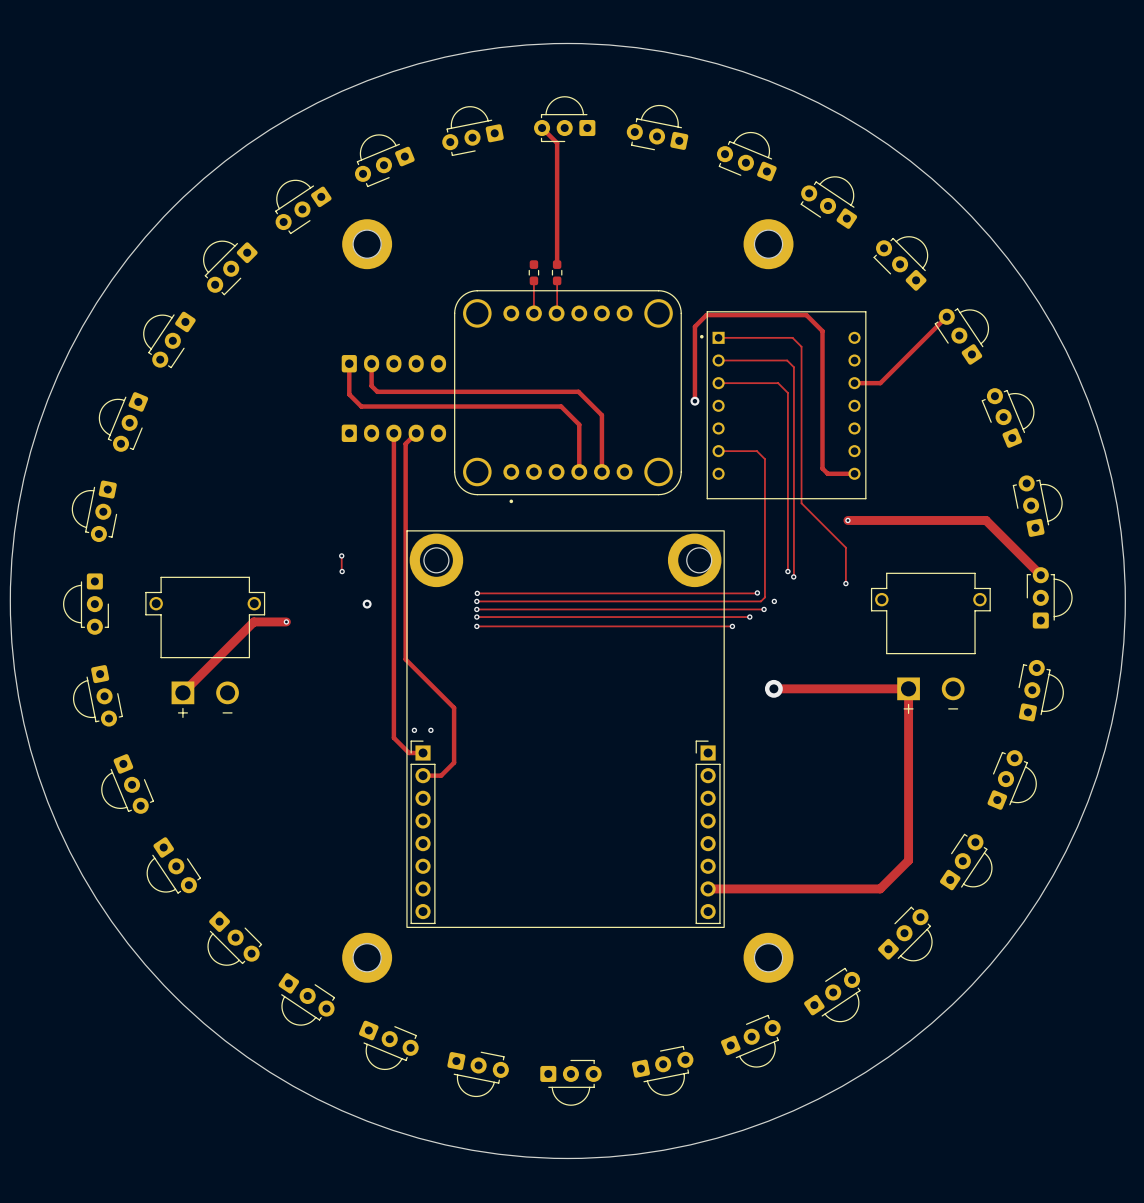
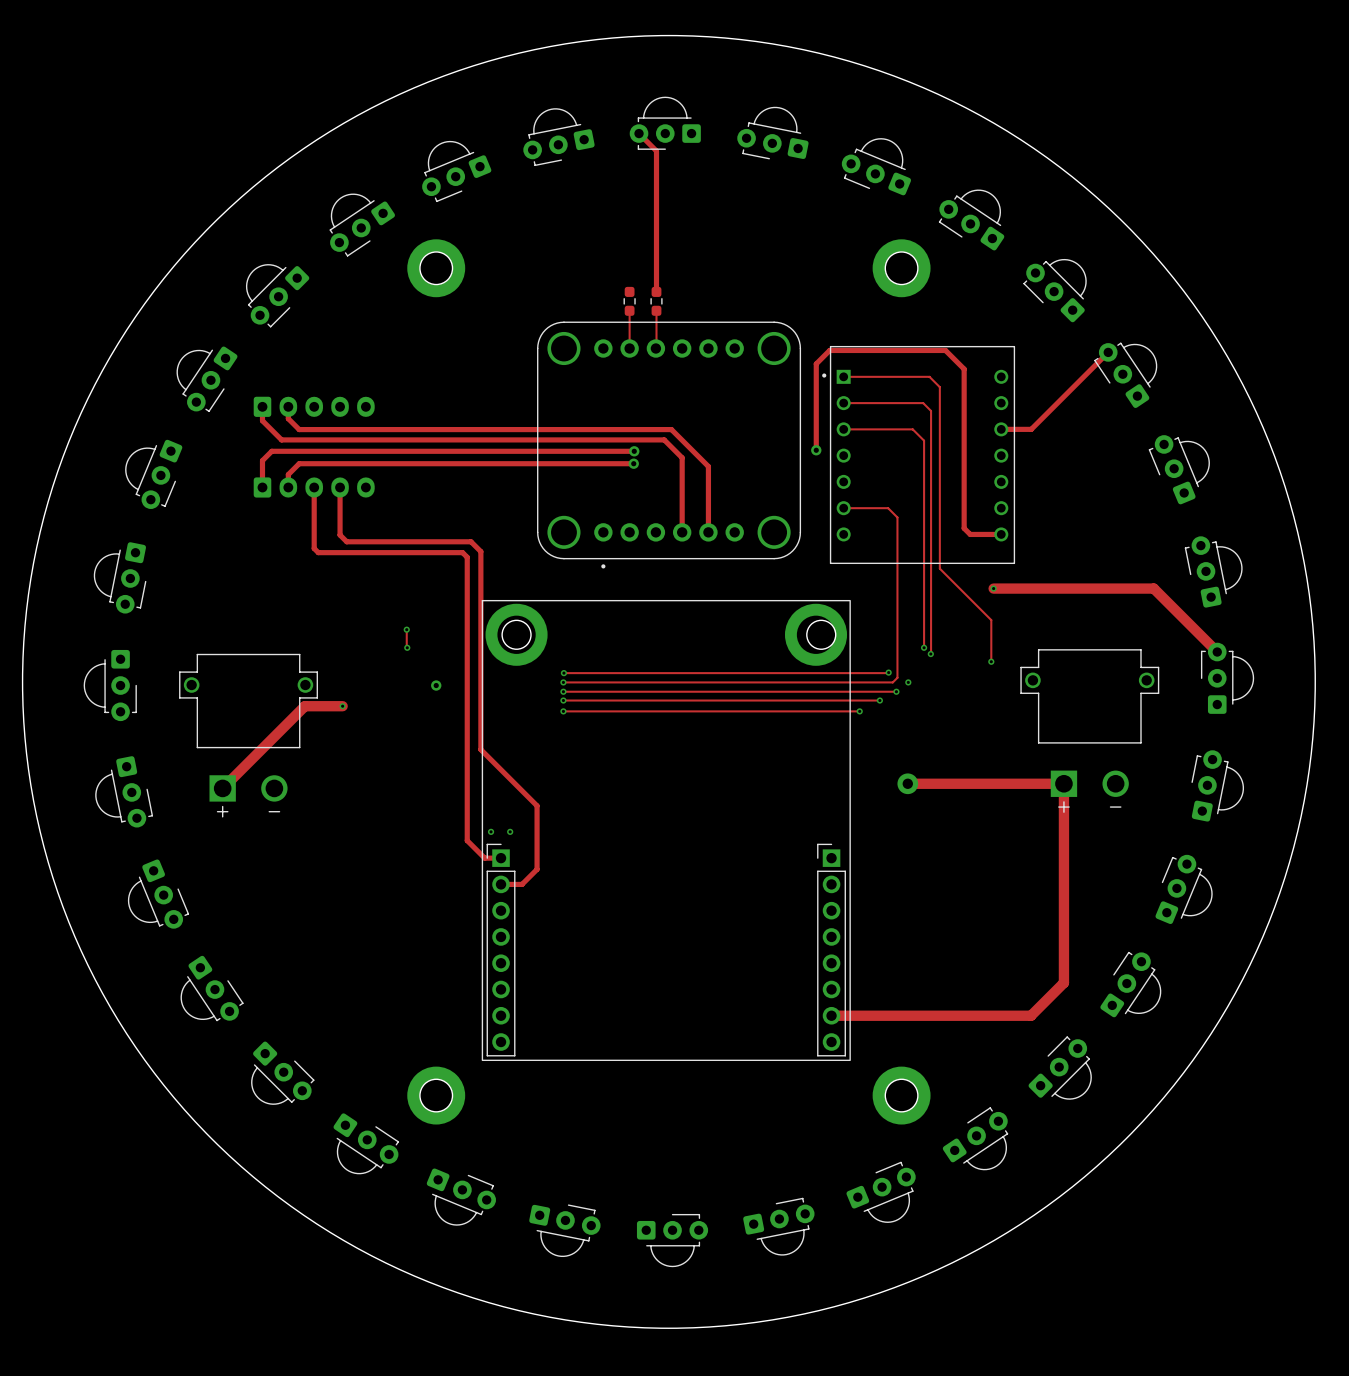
part: none -> (314, 406)
track: (349, 363) (349, 394) (361, 406) (561, 406) (579, 424) -> (262, 406) (262, 420) (281, 439) (664, 439) (682, 457) (682, 477)
track: (371, 363) (371, 386) (377, 391) (578, 391) -> (288, 406) (288, 418) (299, 429) (671, 429) (681, 439)
part: (393, 363) -> none
track: none -> (634, 451) (271, 451) (262, 460) (262, 487)
via: none -> (634, 451)
track: none -> (633, 463) (299, 463) (288, 474) (288, 487)
via: none -> (633, 463)
part: none -> (314, 487)
track: (393, 433) (393, 493) -> (314, 487) (314, 548) (318, 552) (462, 552) (467, 557)
part: (393, 433) -> none
track: (416, 433) (405, 443) (405, 488) -> (340, 487) (340, 535) (346, 541) (471, 541) (480, 551)

